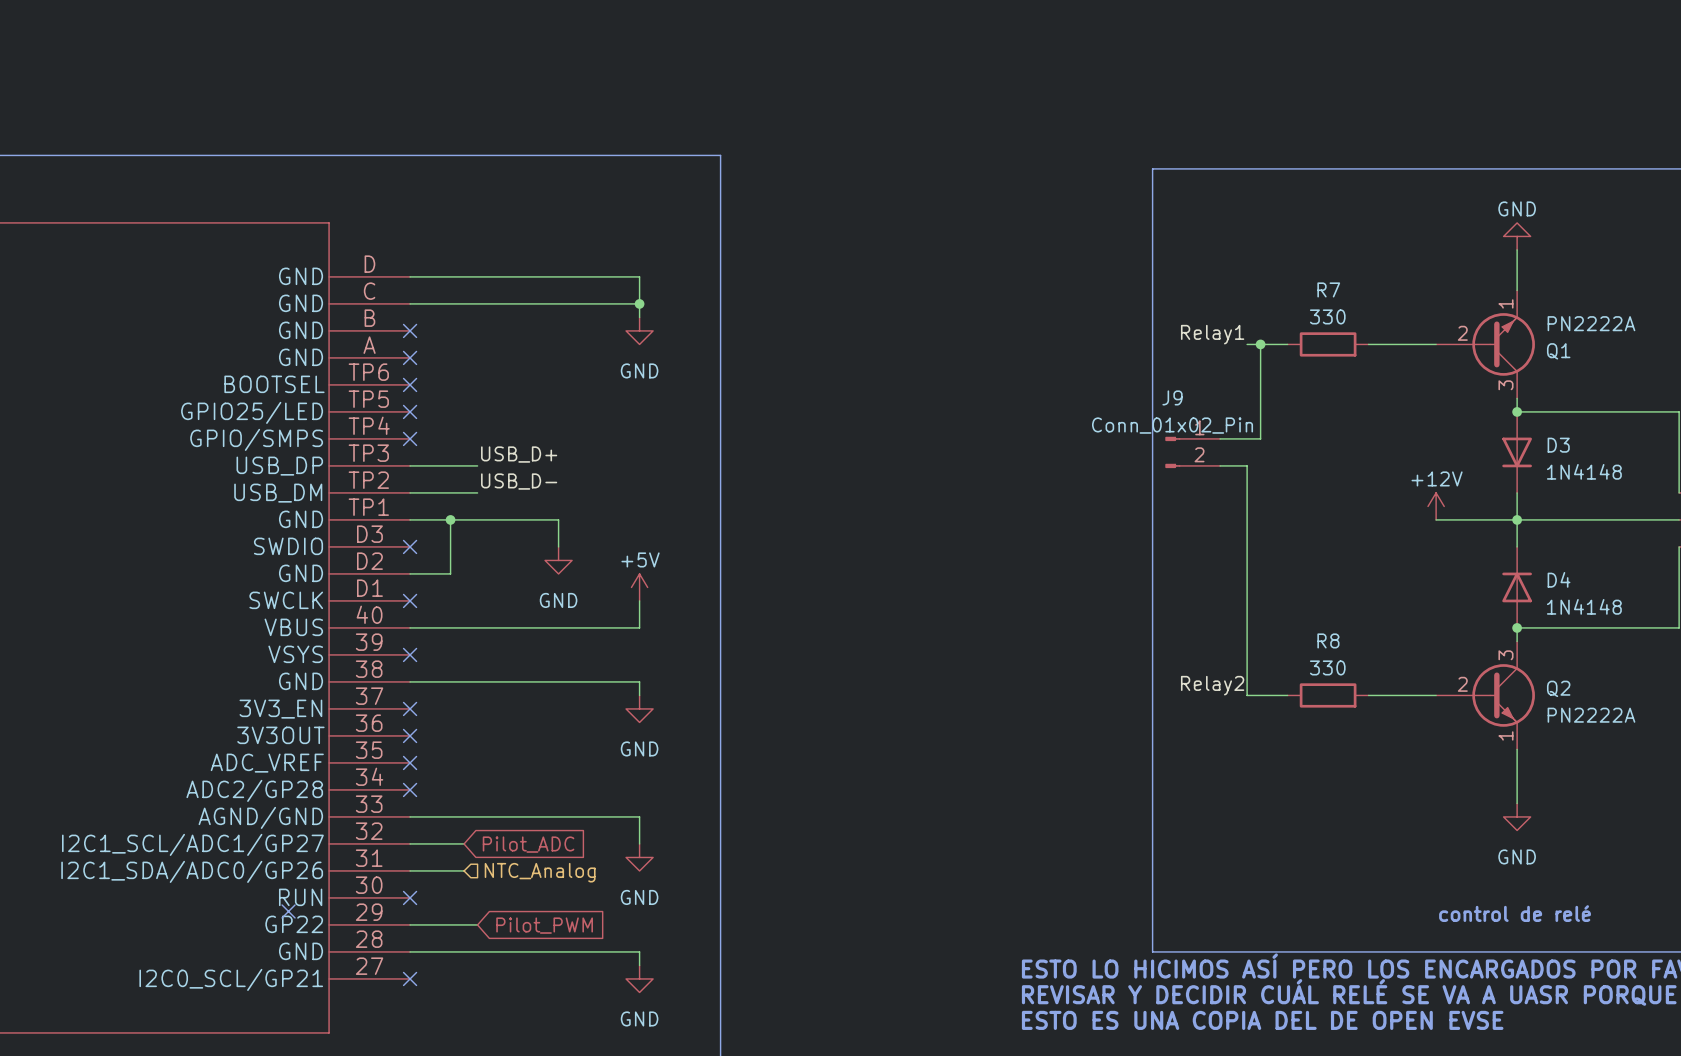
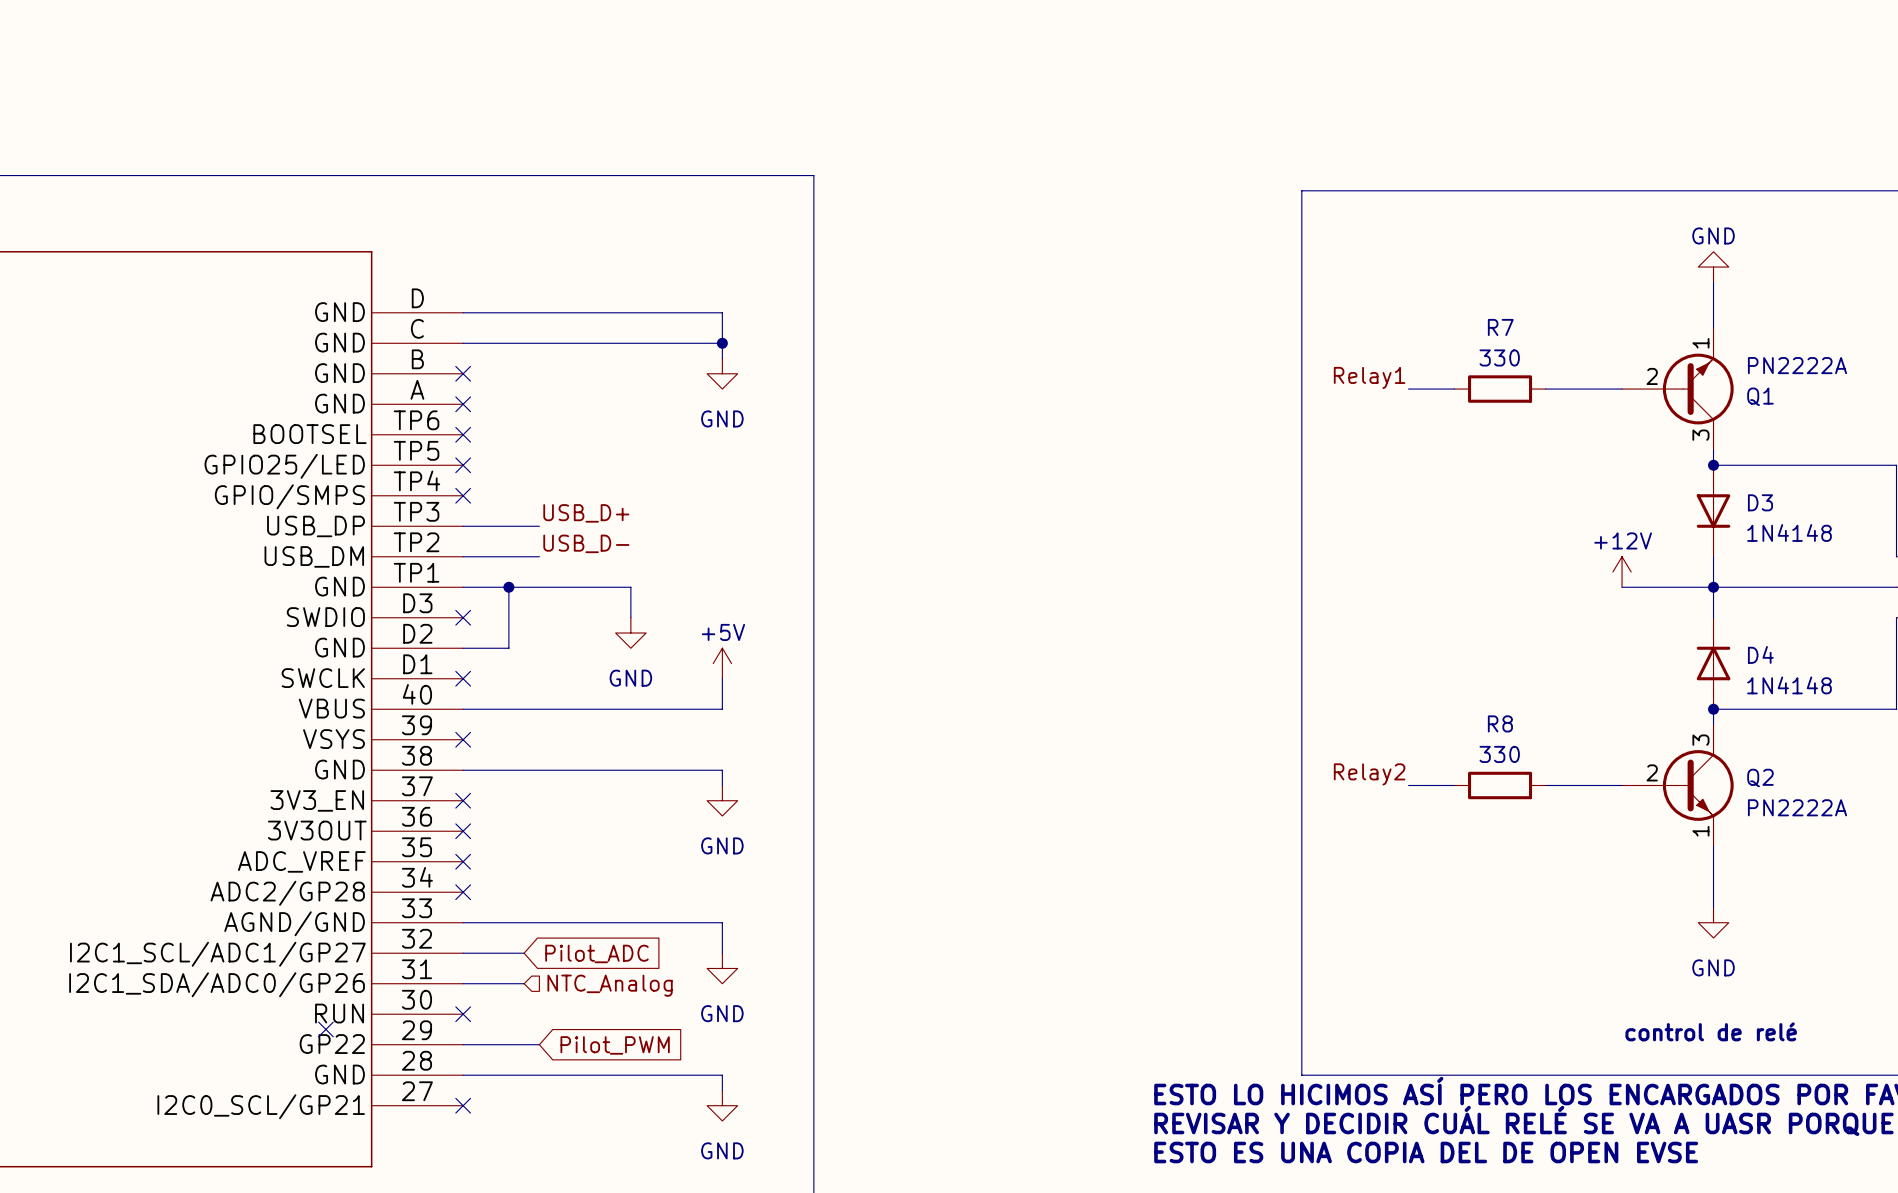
wire: (1260, 344) (1260, 438) (1220, 438) -> none
junction: (1260, 344) -> none
J9: Conn_01x02_Pin (1192, 452) -> none
wire: (1220, 465) (1247, 465) (1247, 695) -> none

